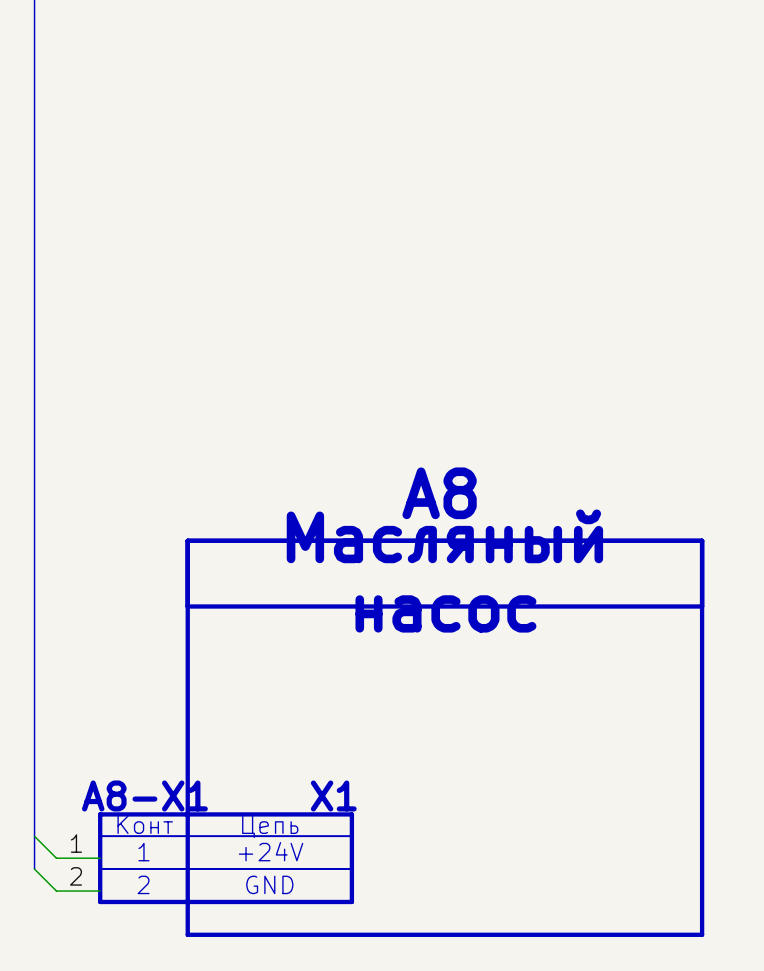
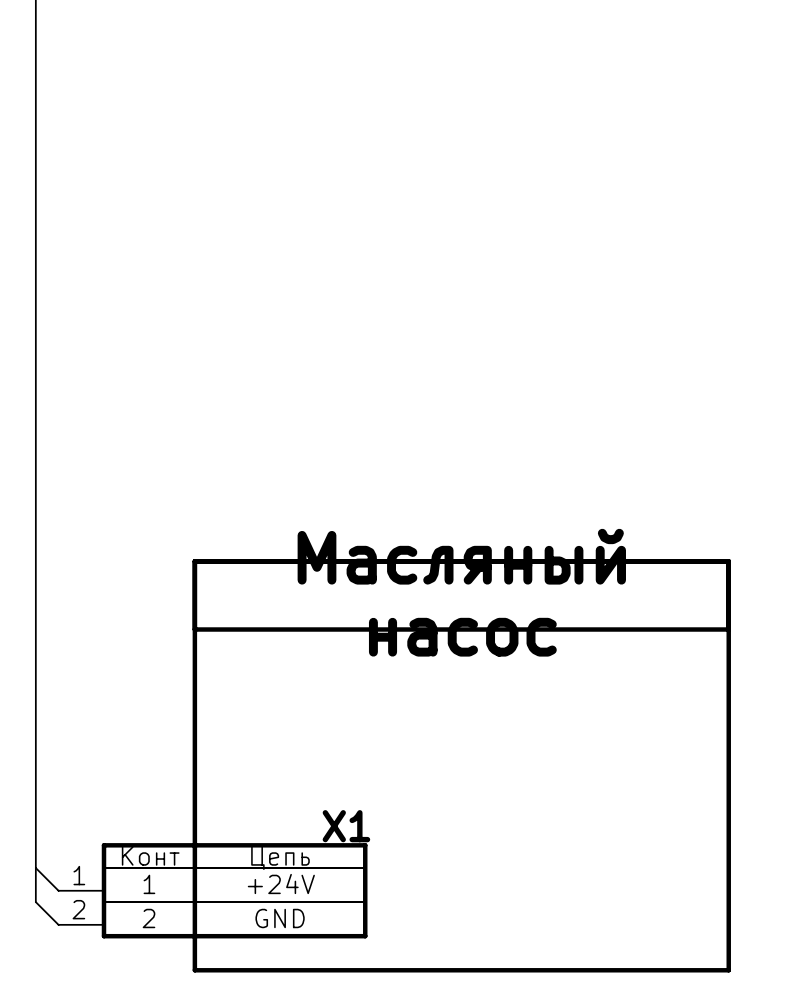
text: А8 (439, 493) -> none
text: A8-X1 (144, 795) -> none

